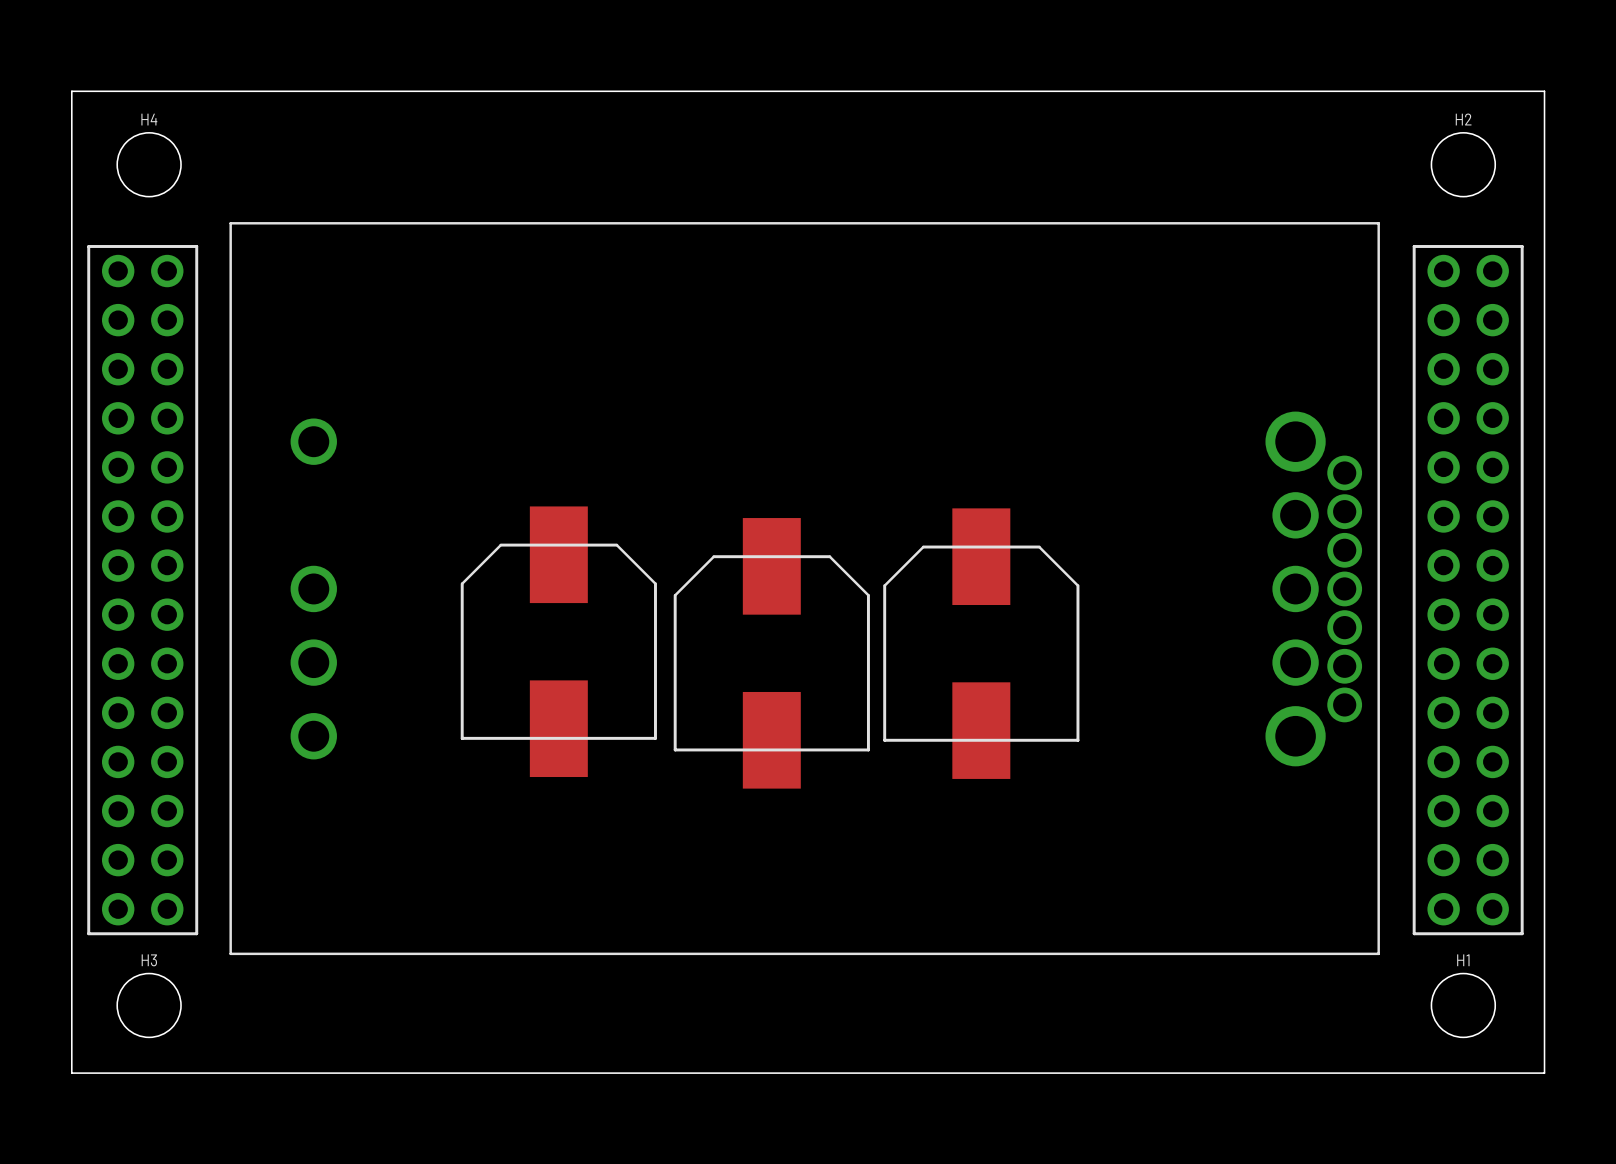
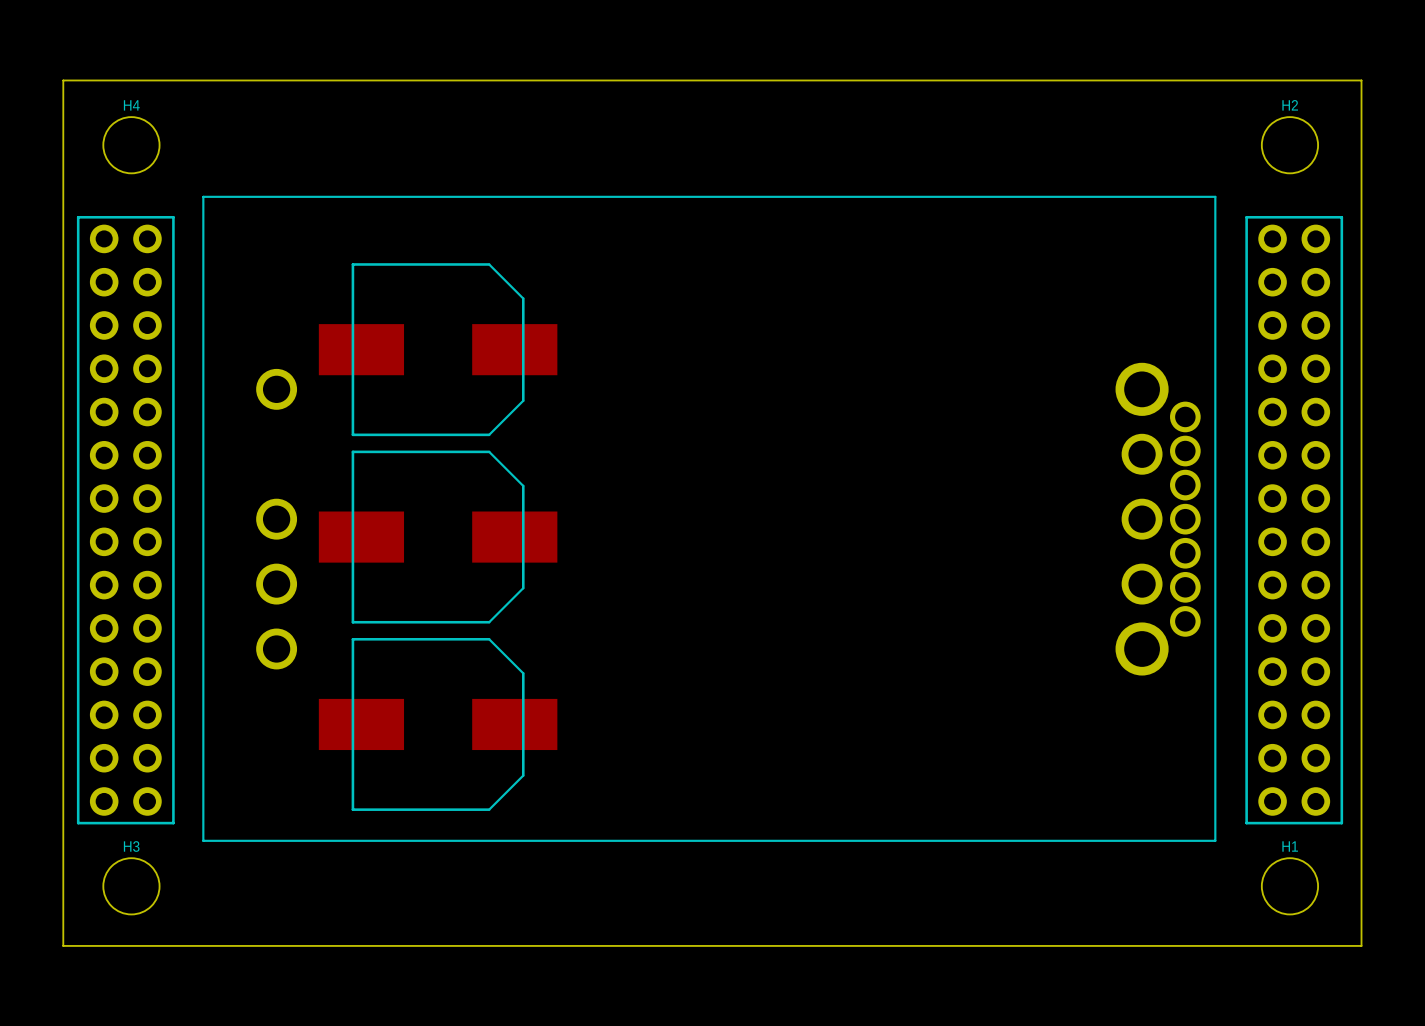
part: none -> (438, 349)
part rotation: 0° (558, 641) -> 90° clockwise (438, 537)
part: (981, 643) -> none
part: (771, 653) -> none
part: none -> (438, 724)

